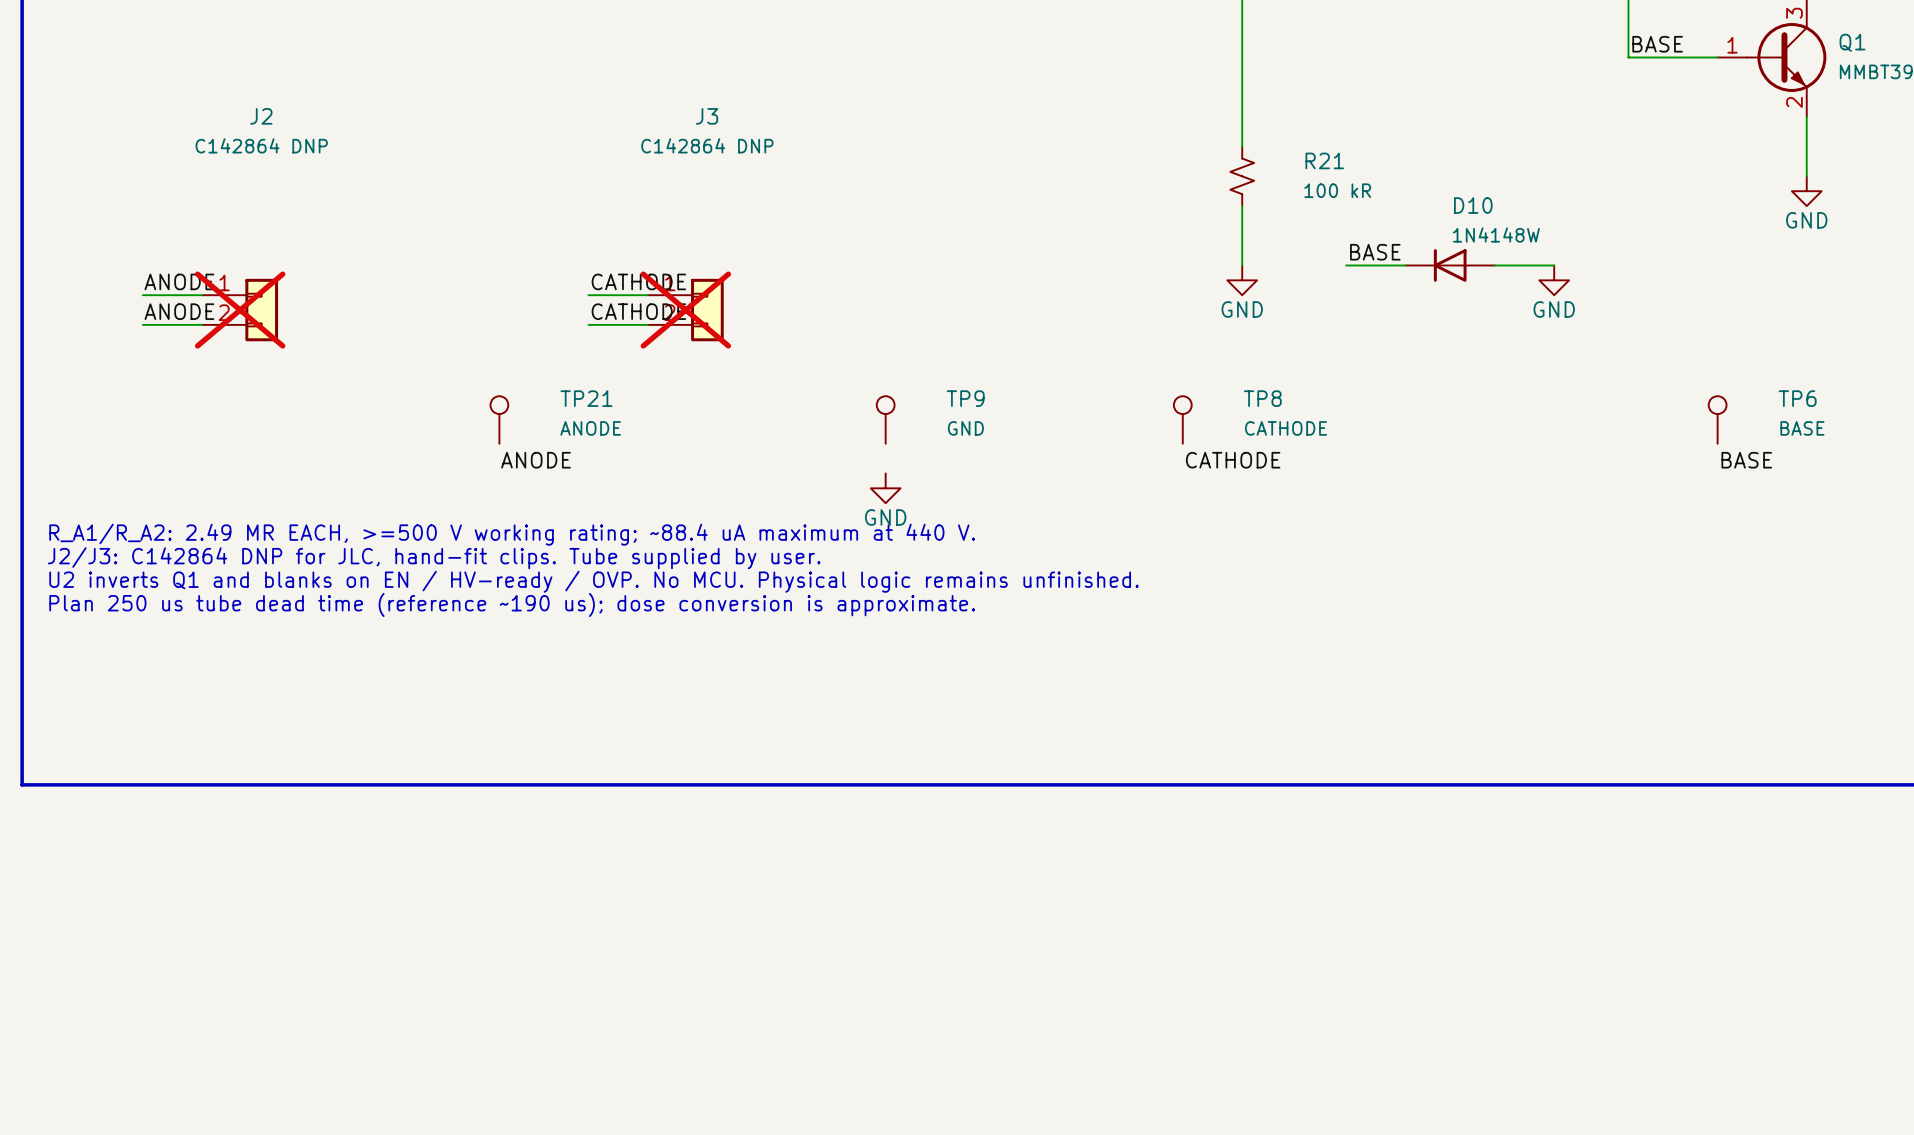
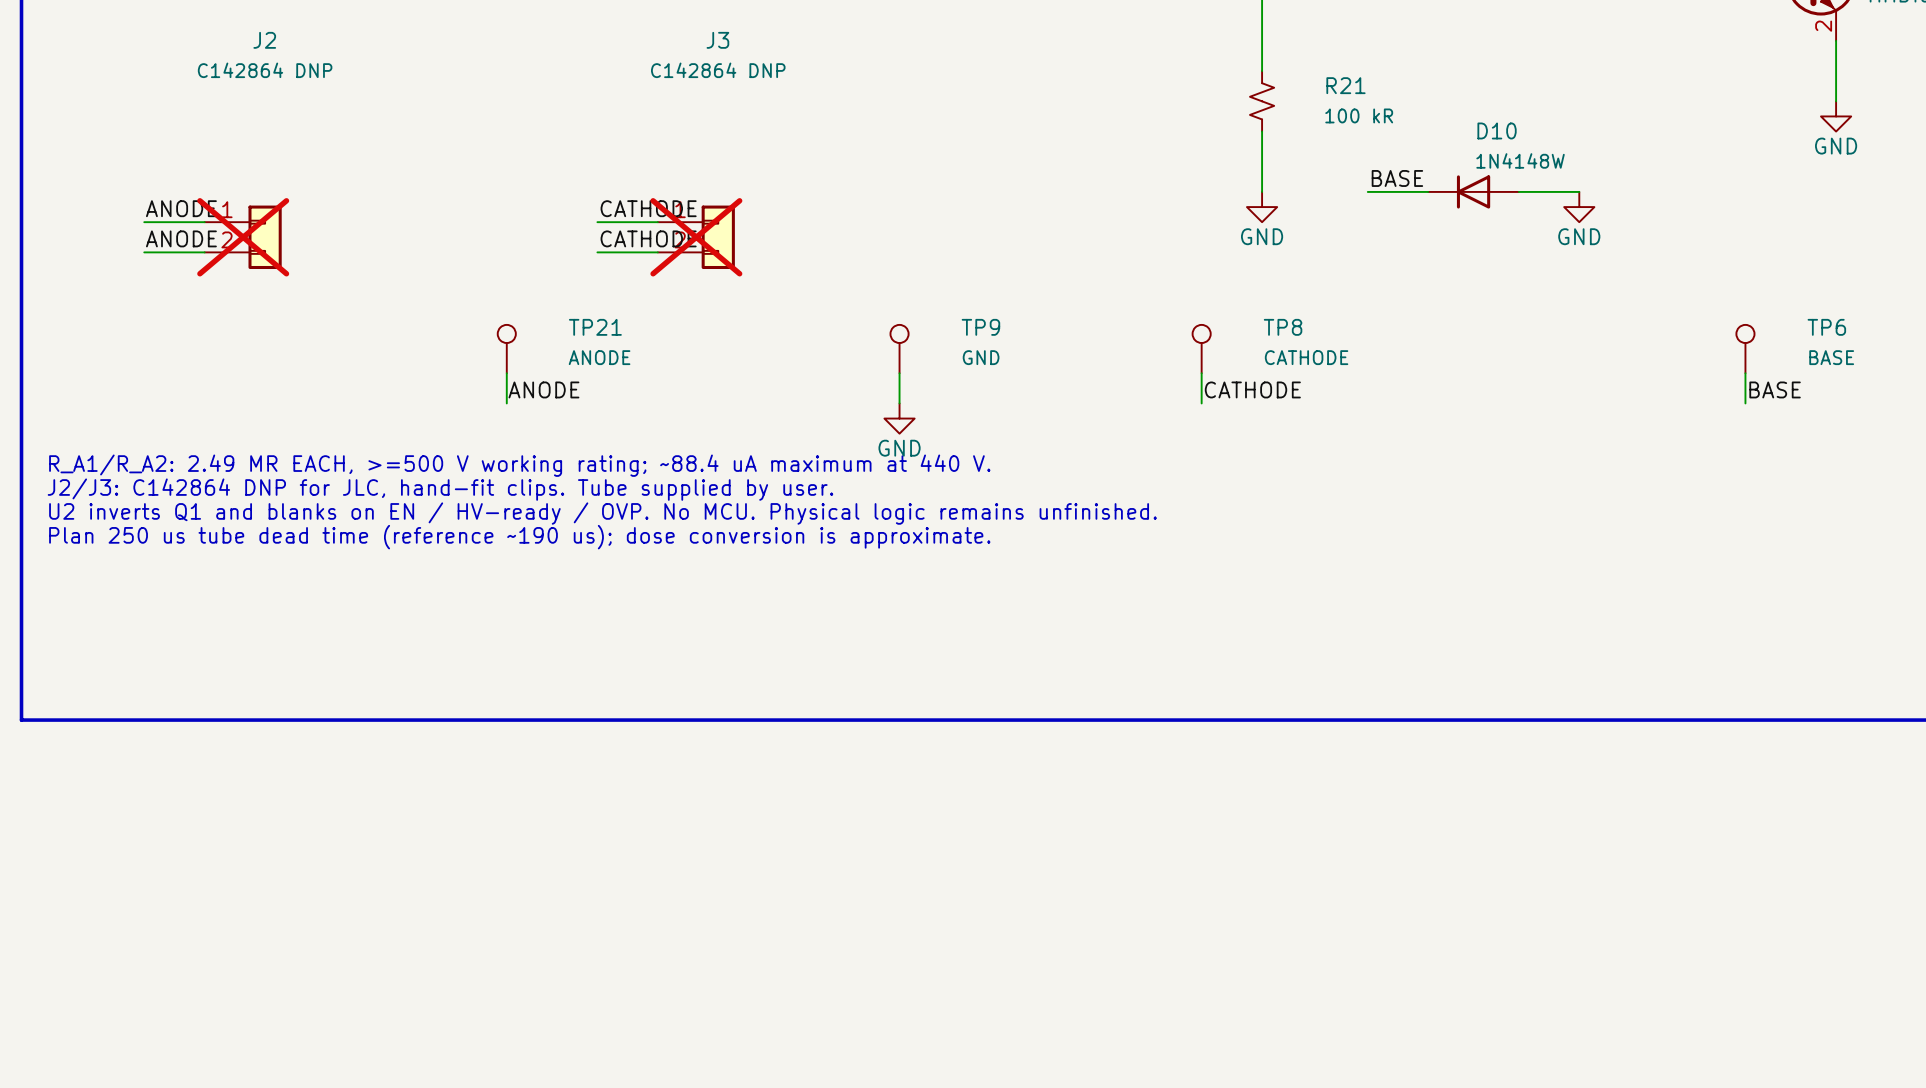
wire: none -> (506, 373) (506, 403)
wire: none -> (899, 373) (899, 403)
wire: none -> (1201, 373) (1201, 403)
wire: none -> (1745, 373) (1745, 403)

